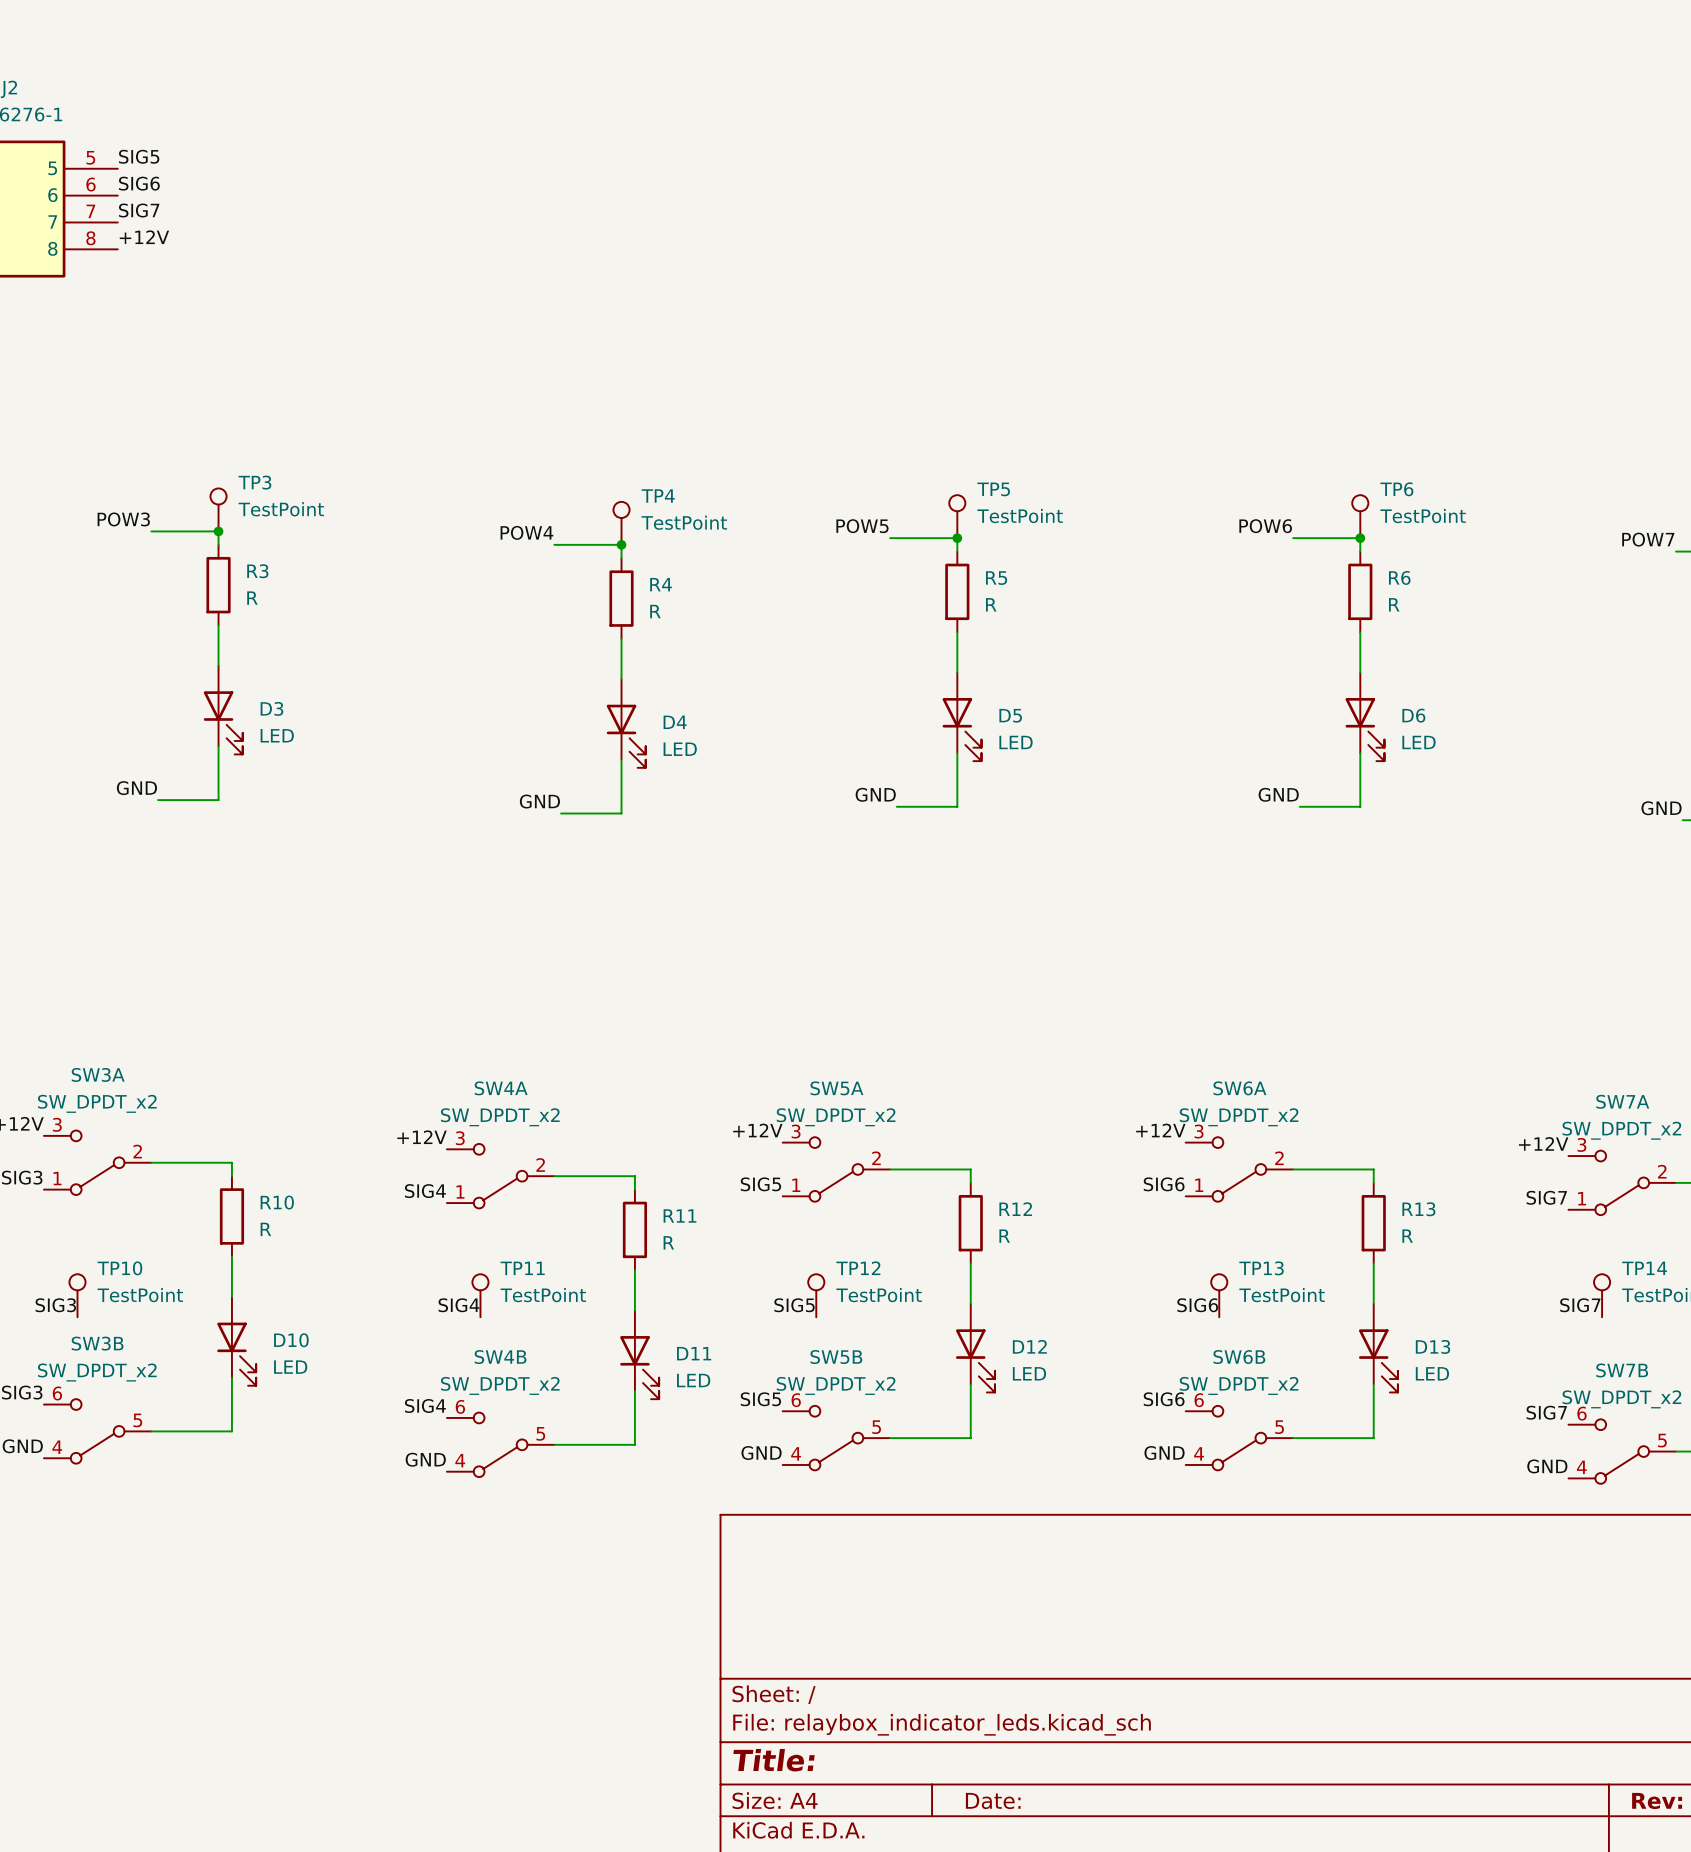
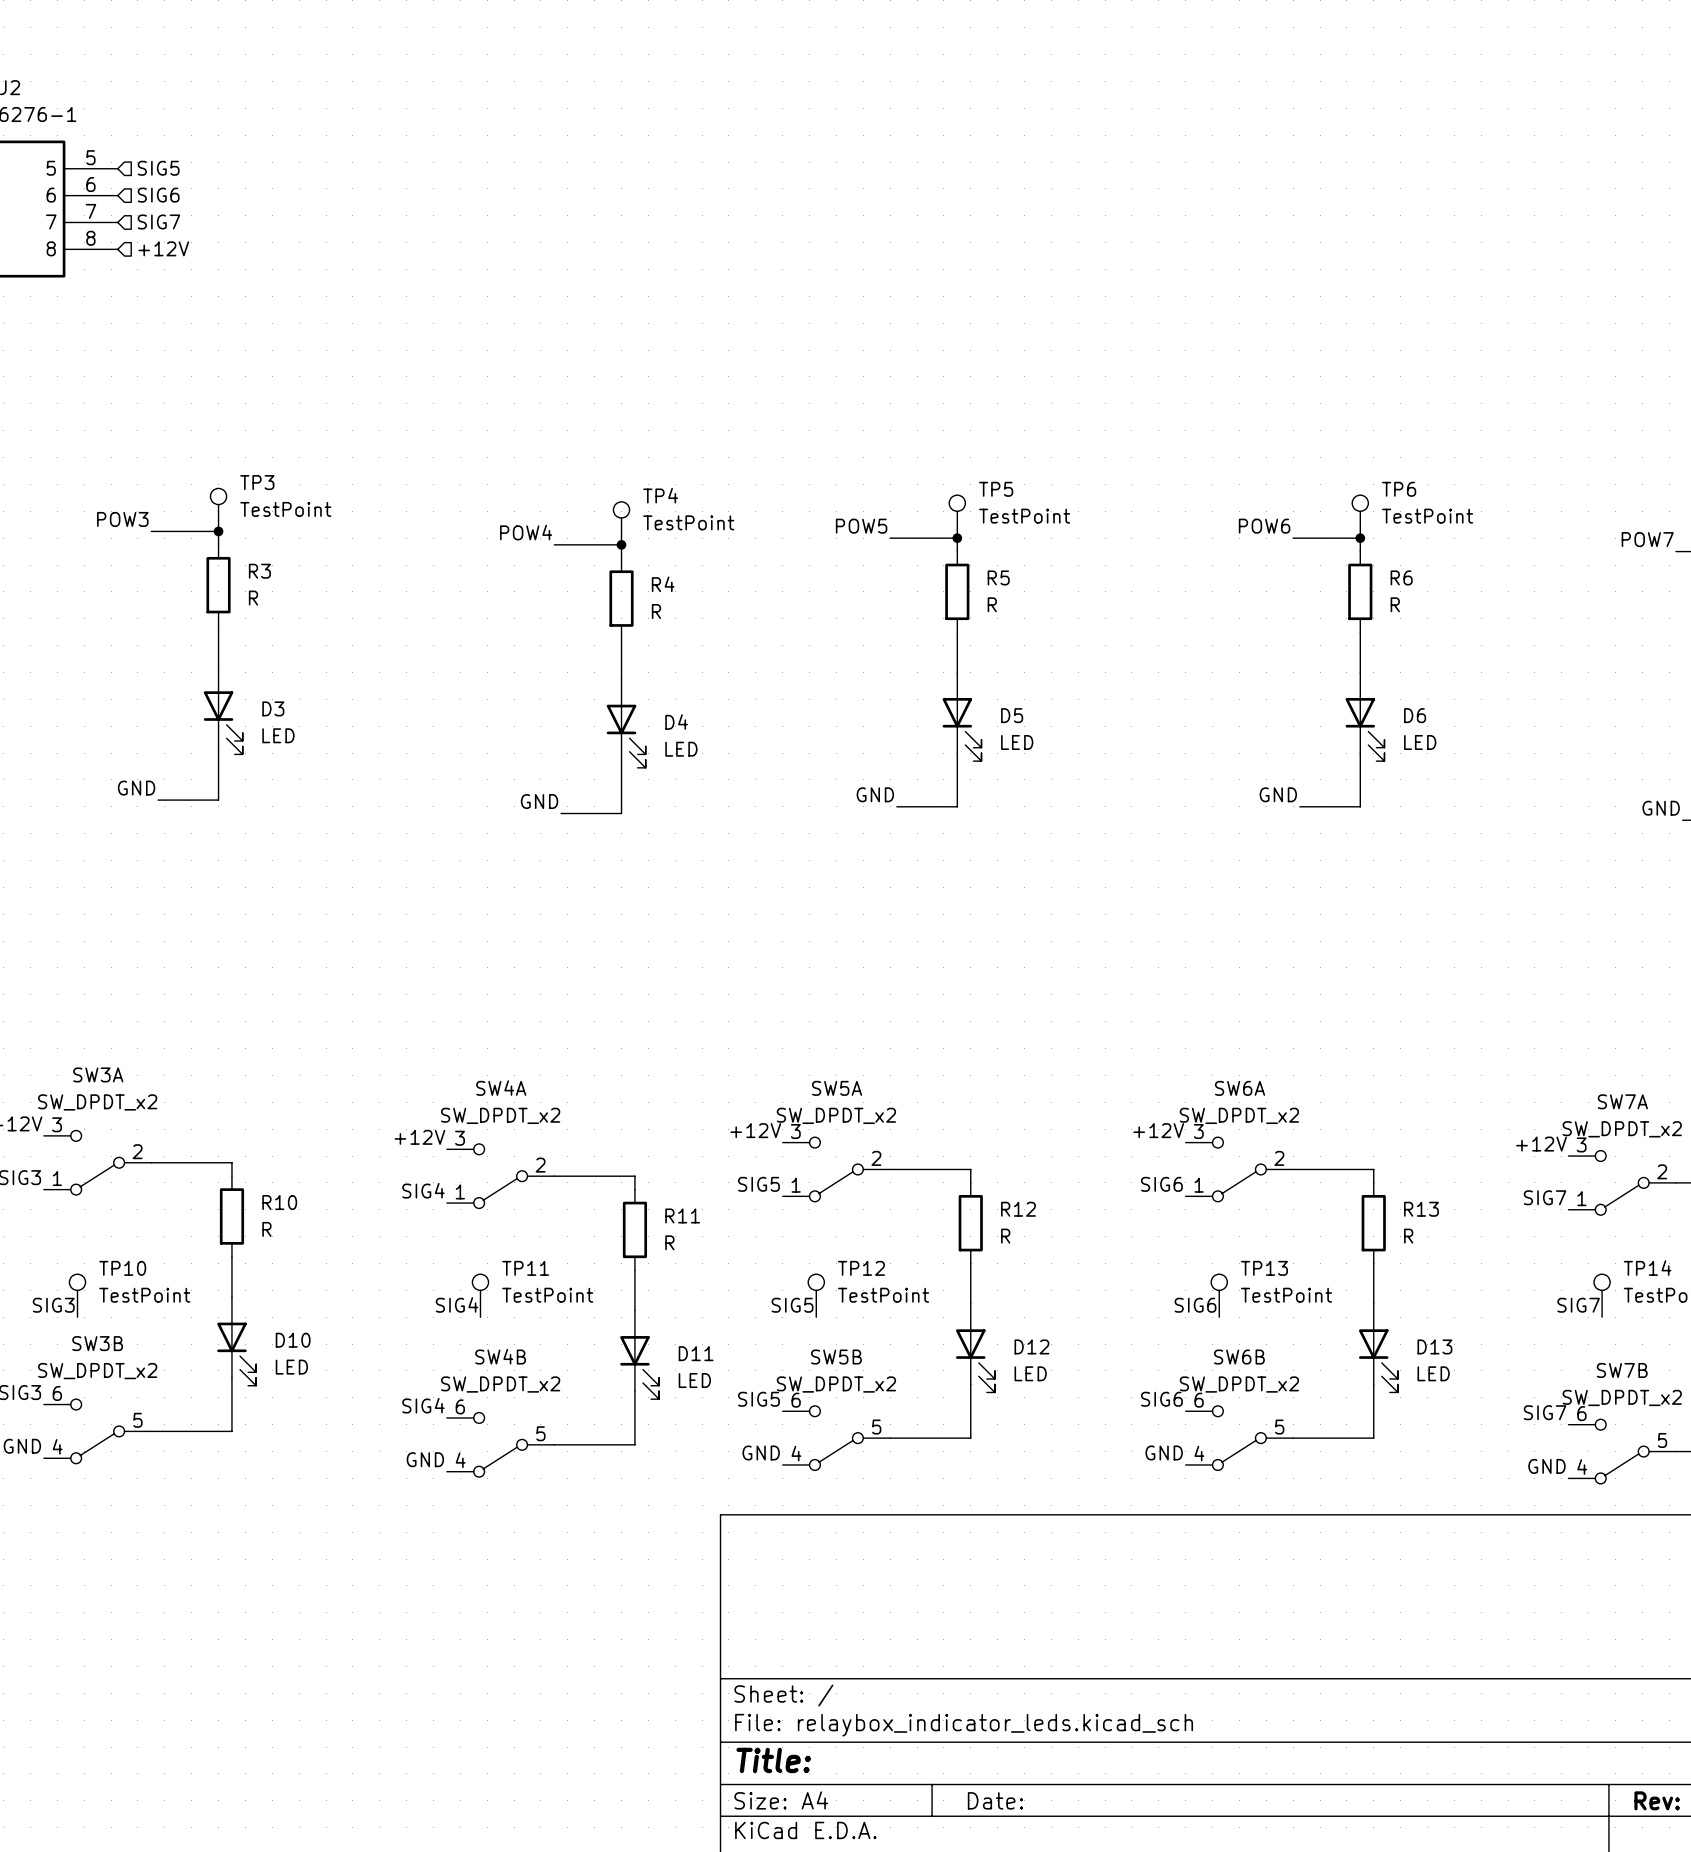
label: SIG5 (139, 156) -> none
hierarchical label: none -> SIG5 (158, 168)
label: SIG6 (139, 183) -> none
hierarchical label: none -> SIG6 (158, 195)
label: SIG7 (139, 210) -> none
hierarchical label: none -> SIG7 (158, 221)
label: +12V (144, 237) -> none
hierarchical label: none -> +12V (163, 248)

